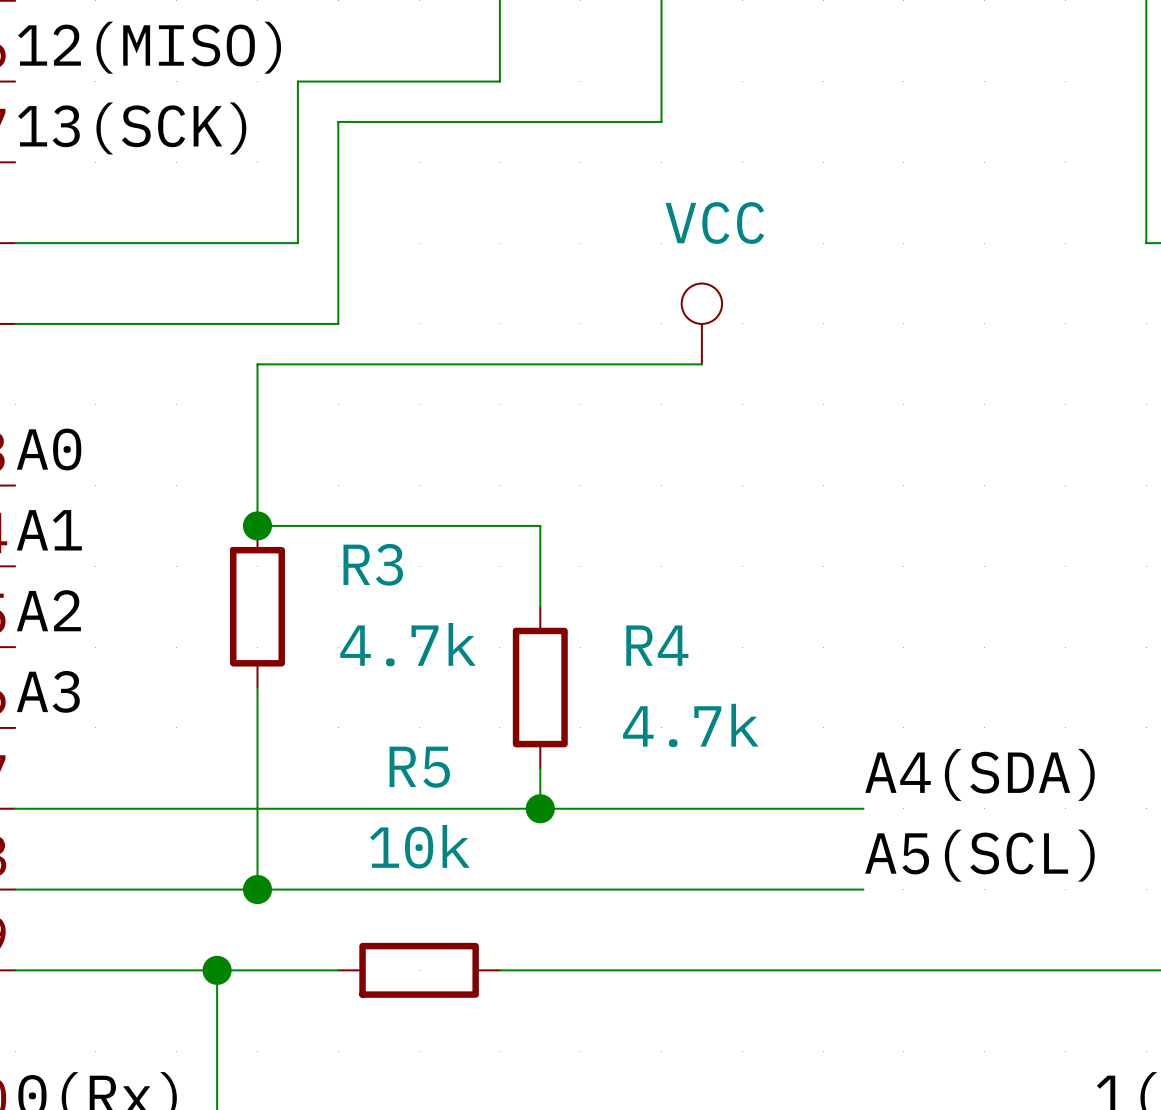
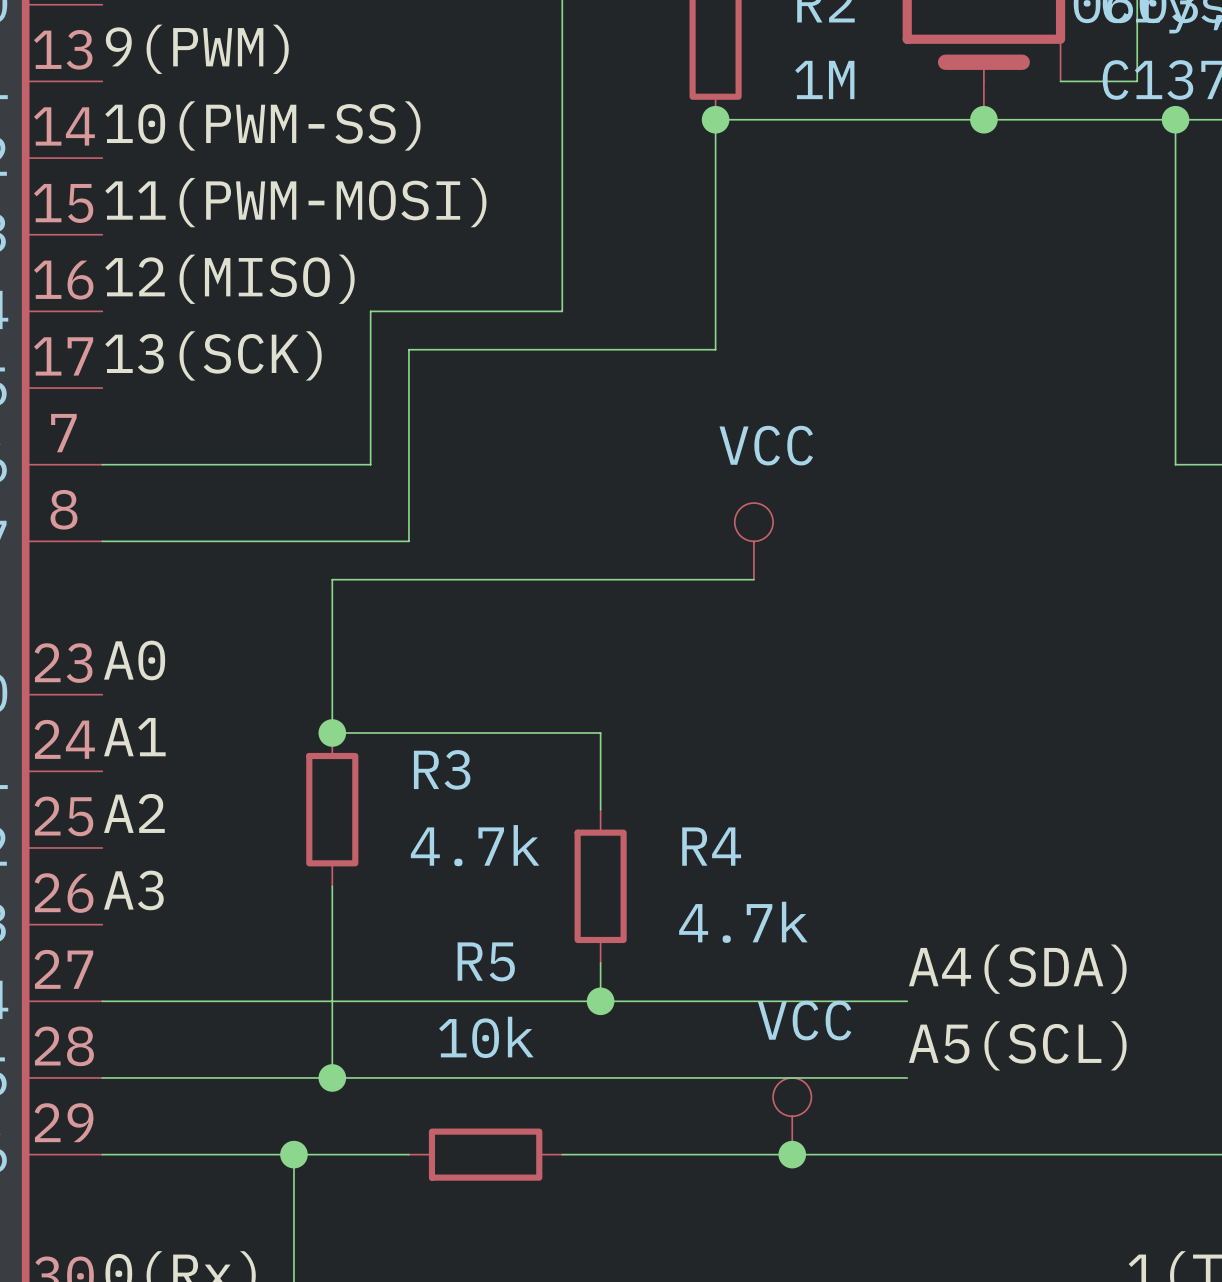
power symbol: none -> VCC (792, 1116)
junction: none -> (792, 1154)

